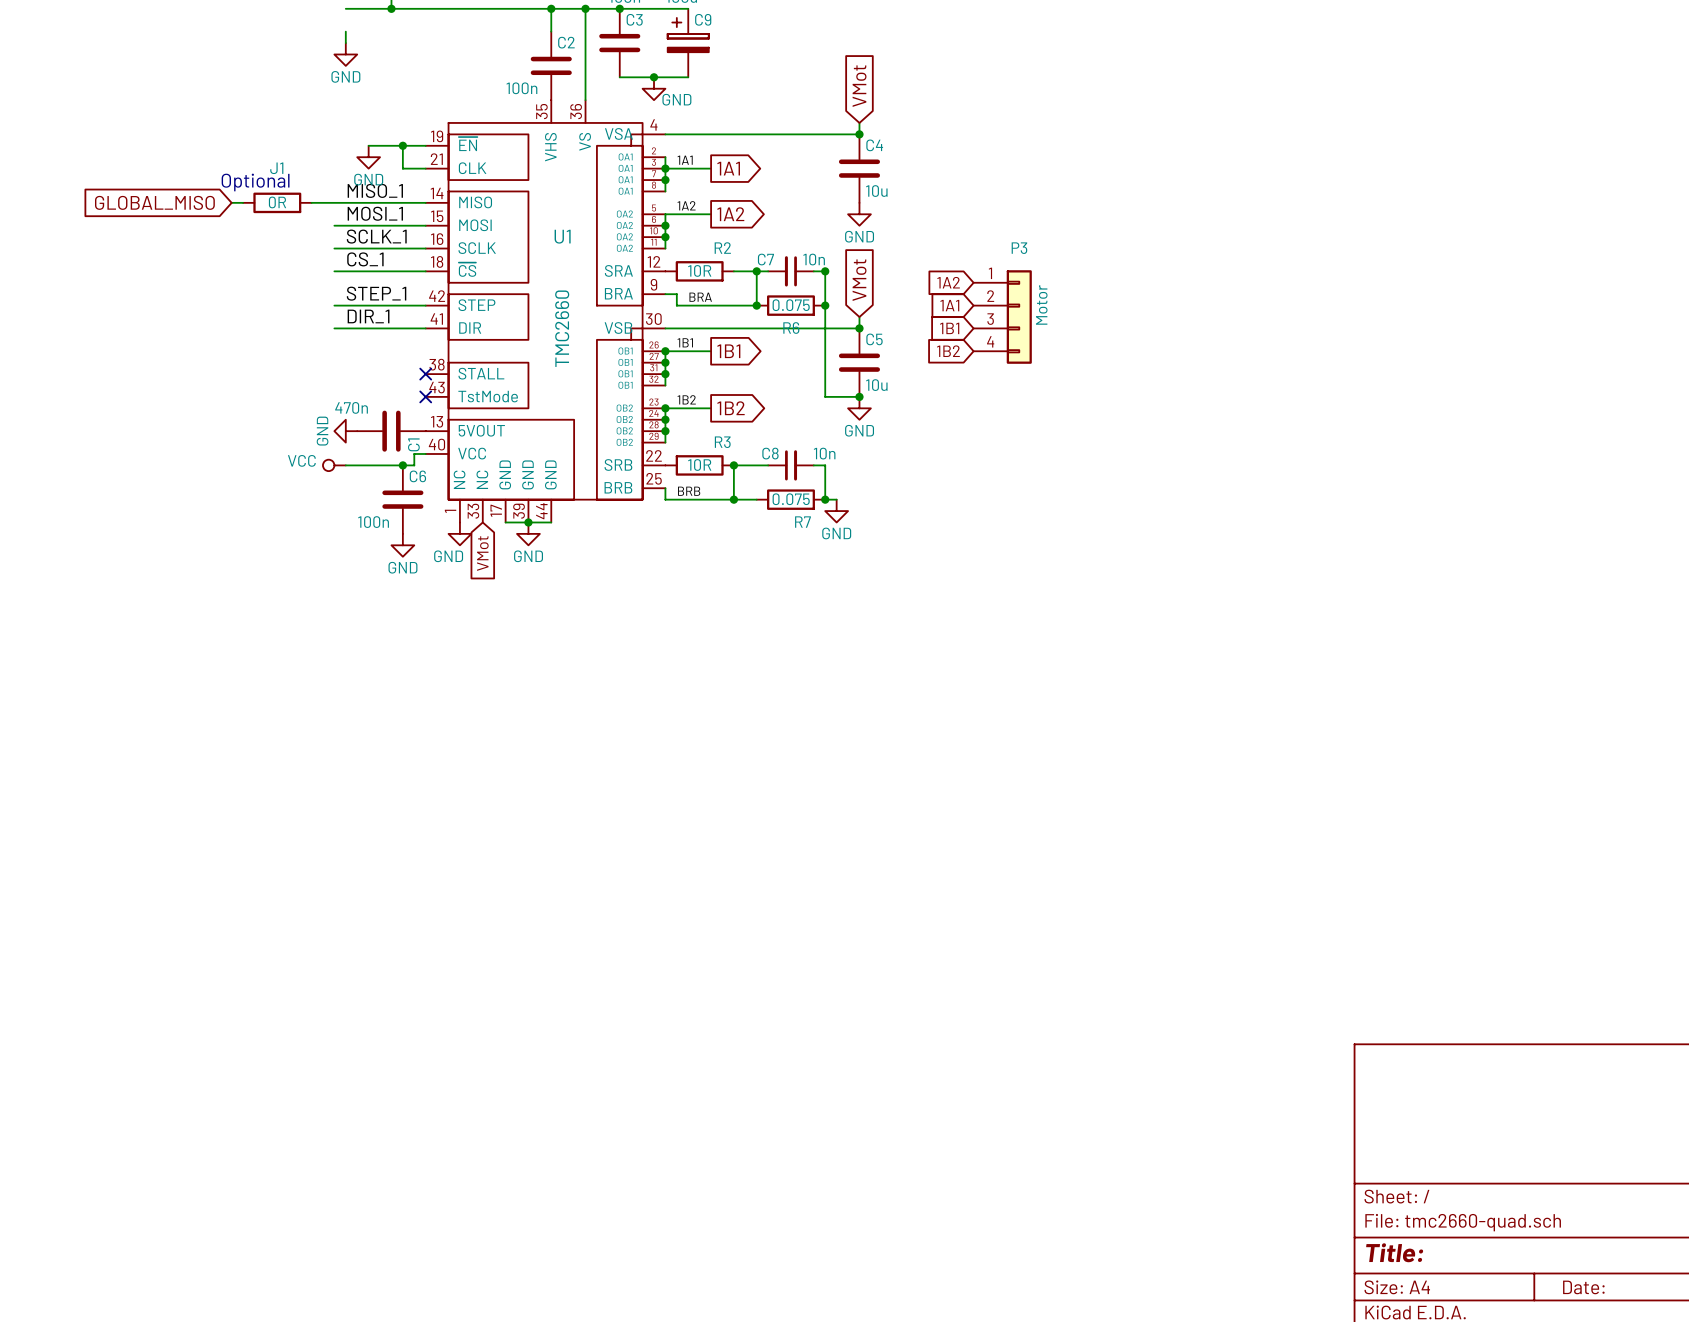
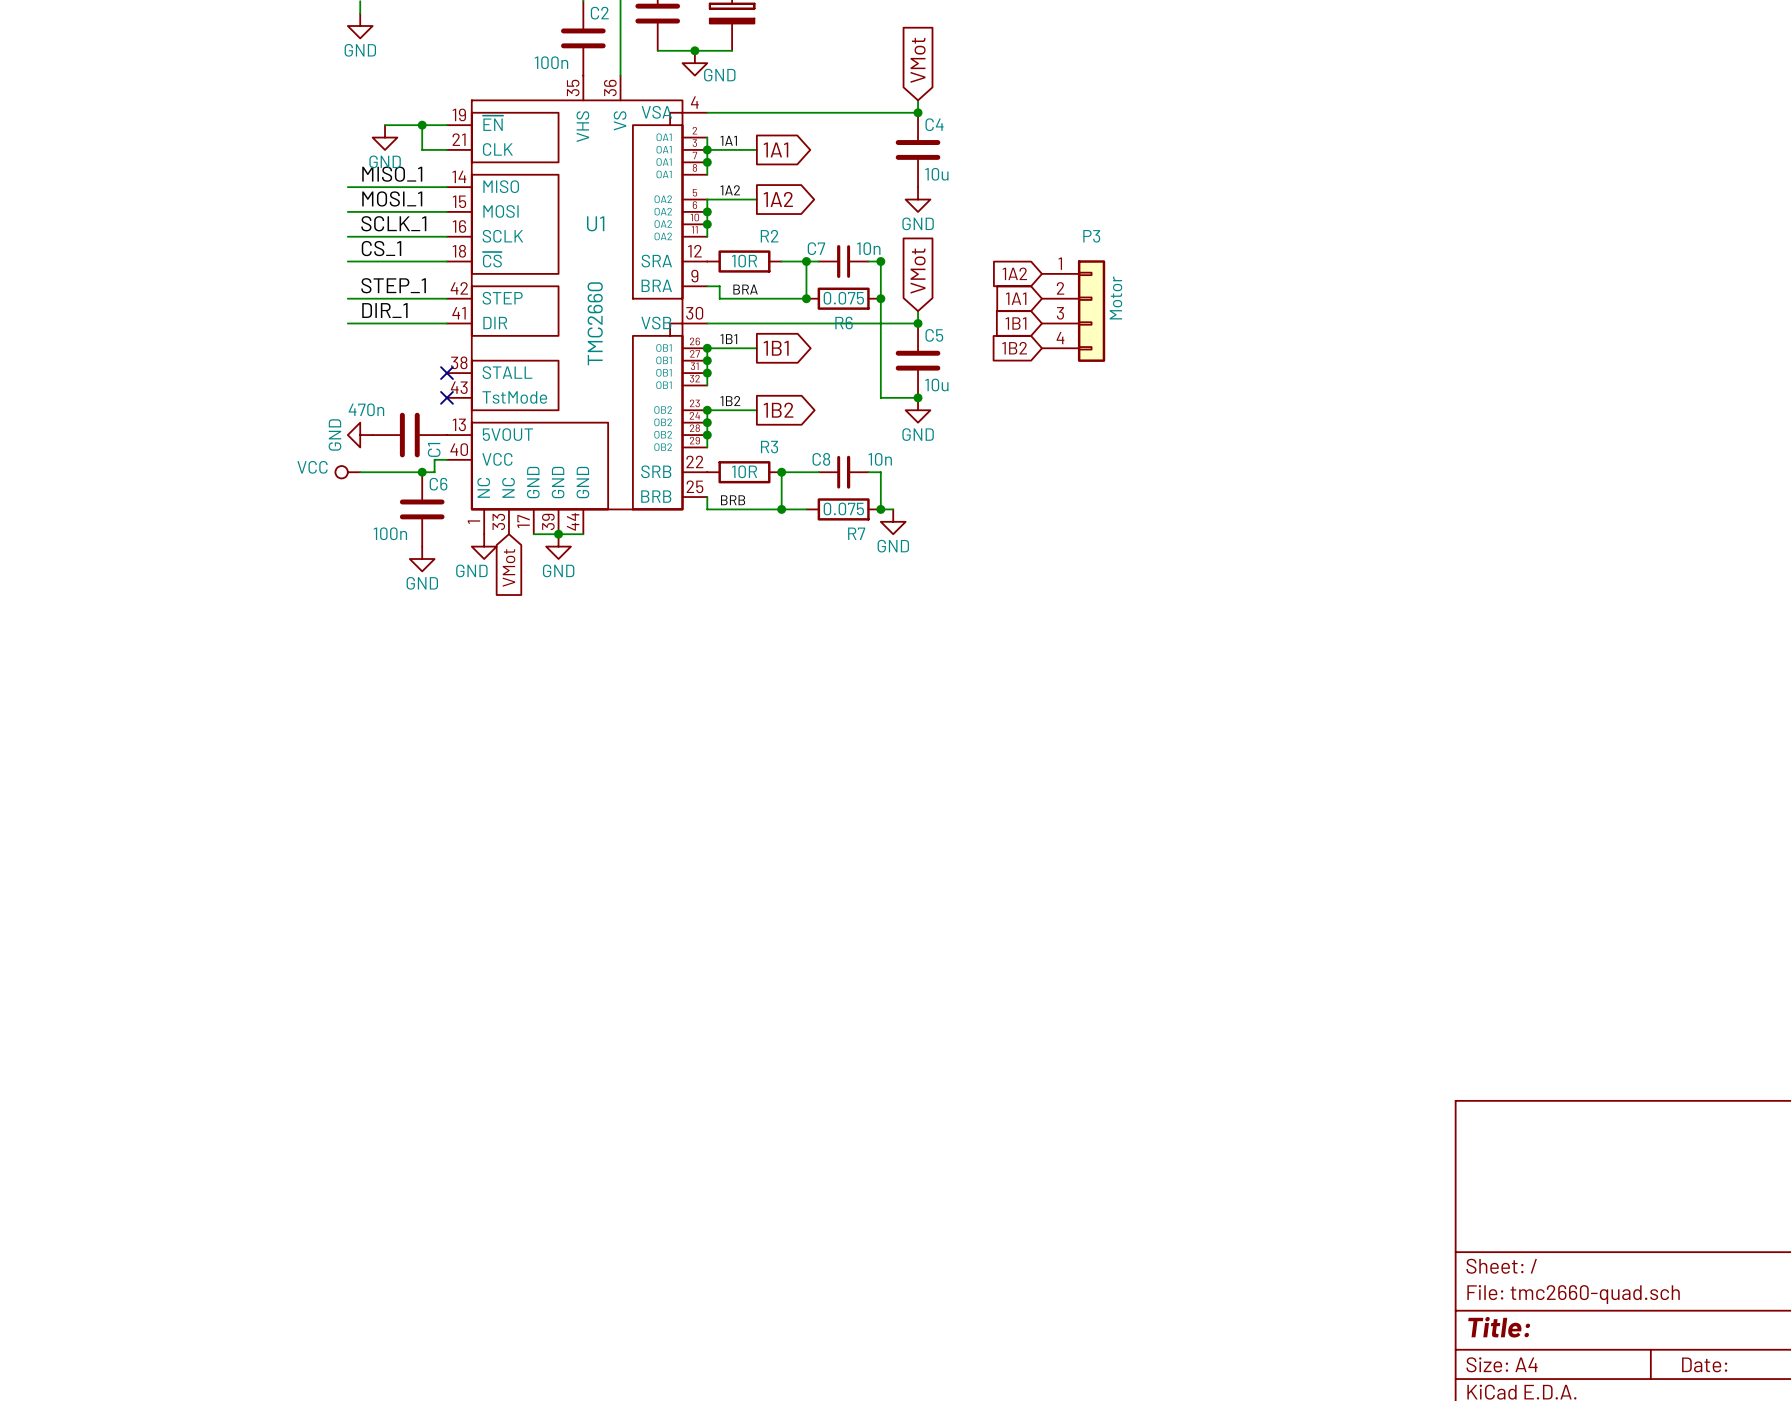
text: Optional (255, 182) -> none
global label: GLOBAL_MISO (154, 202) -> none
wire: (231, 202) (243, 202) -> none
J1: 0R (277, 202) -> none
wire: (311, 202) (334, 202) -> none

